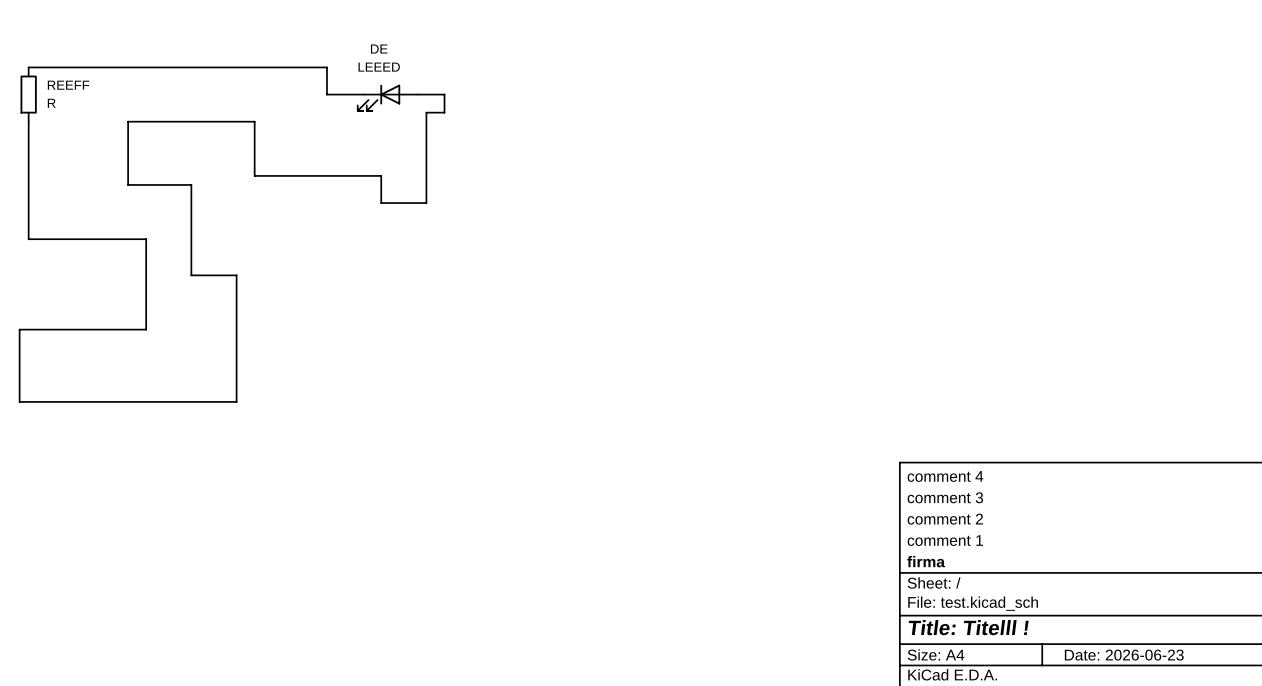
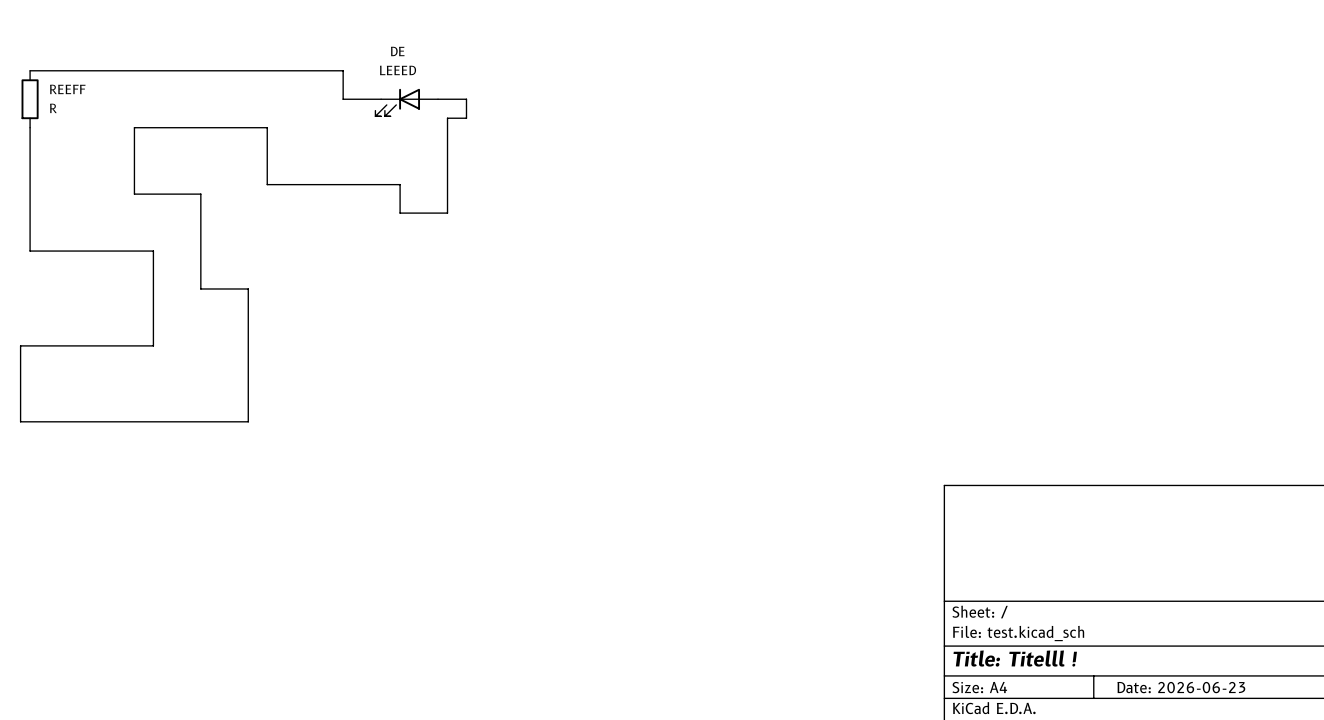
title block: comment 4 (945, 476) -> none
title block: comment 3 (945, 497) -> none
title block: comment 2 (945, 519) -> none
title block: comment 1 (945, 540) -> none
title block: firma (926, 561) -> none

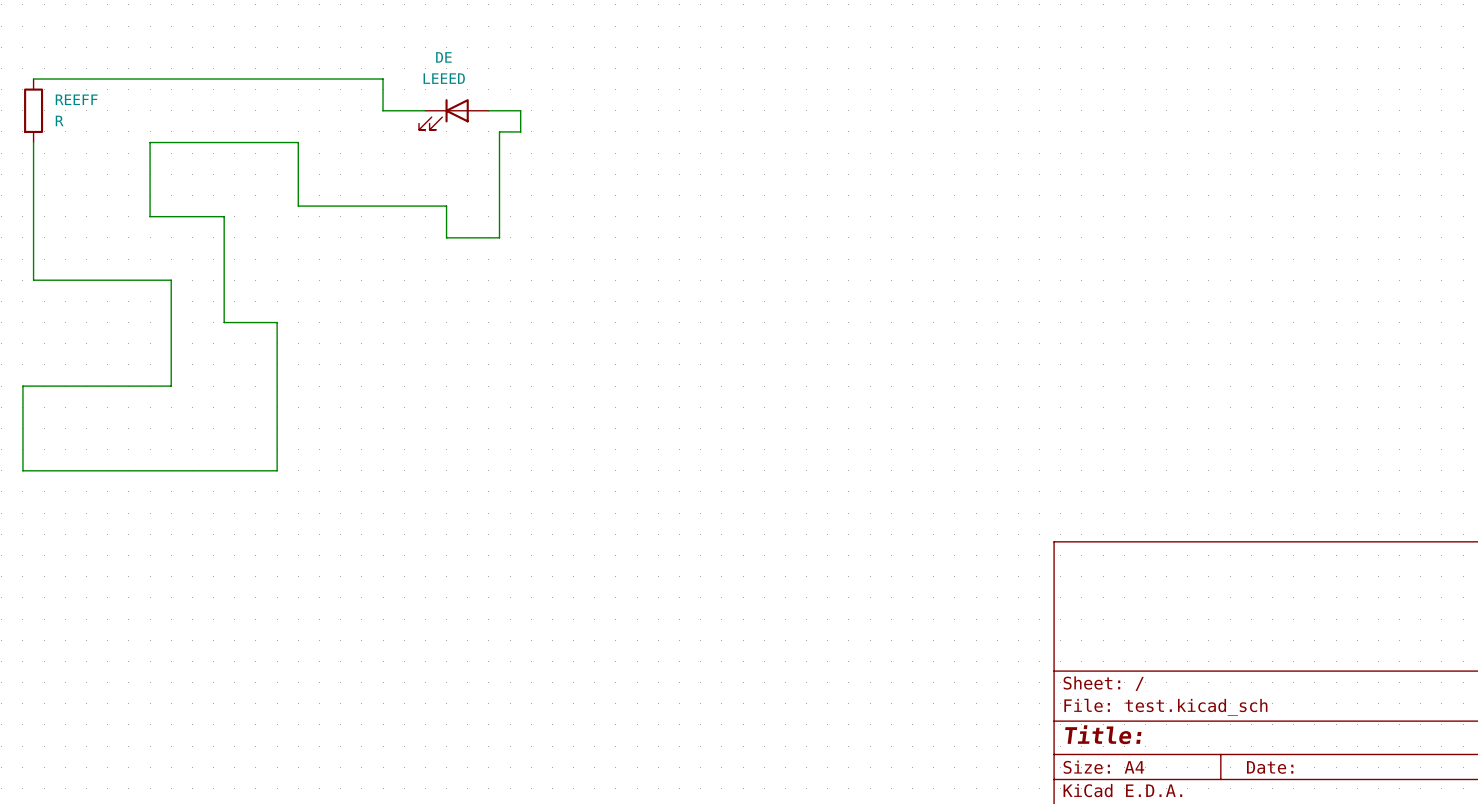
title block: Title: Titelll ! (1015, 658) -> Title: (1103, 734)
title block: Date: 2026-06-23 (1181, 687) -> Date: (1270, 767)

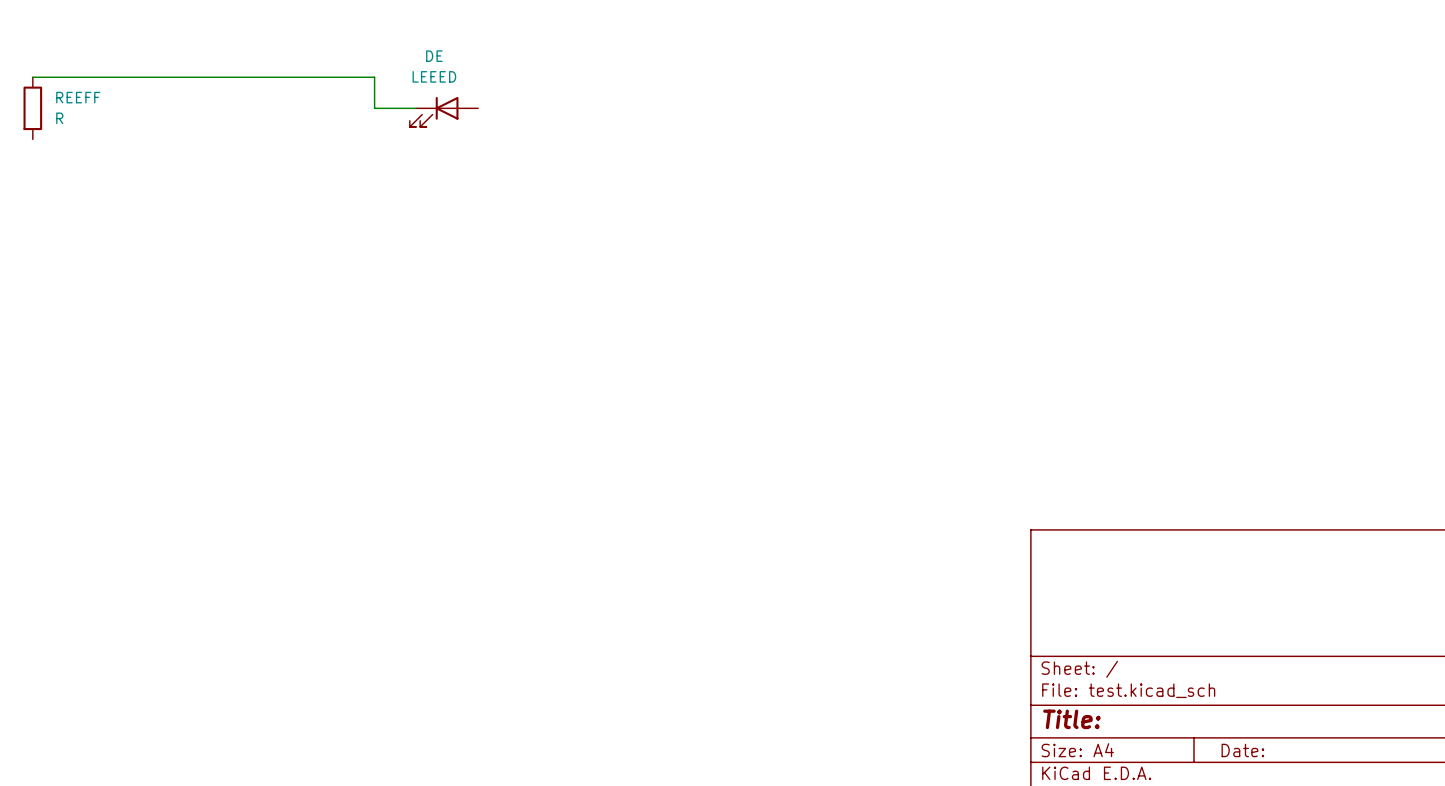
wire: (488, 110) (520, 110) (520, 131) (499, 131) (499, 237) (446, 237) (446, 206) (298, 206) (298, 142) (150, 142) (150, 216) (224, 216) (224, 322) (277, 322) (277, 470) (22, 470) (22, 386) (171, 386) (171, 280) (33, 280) (33, 142) -> none

